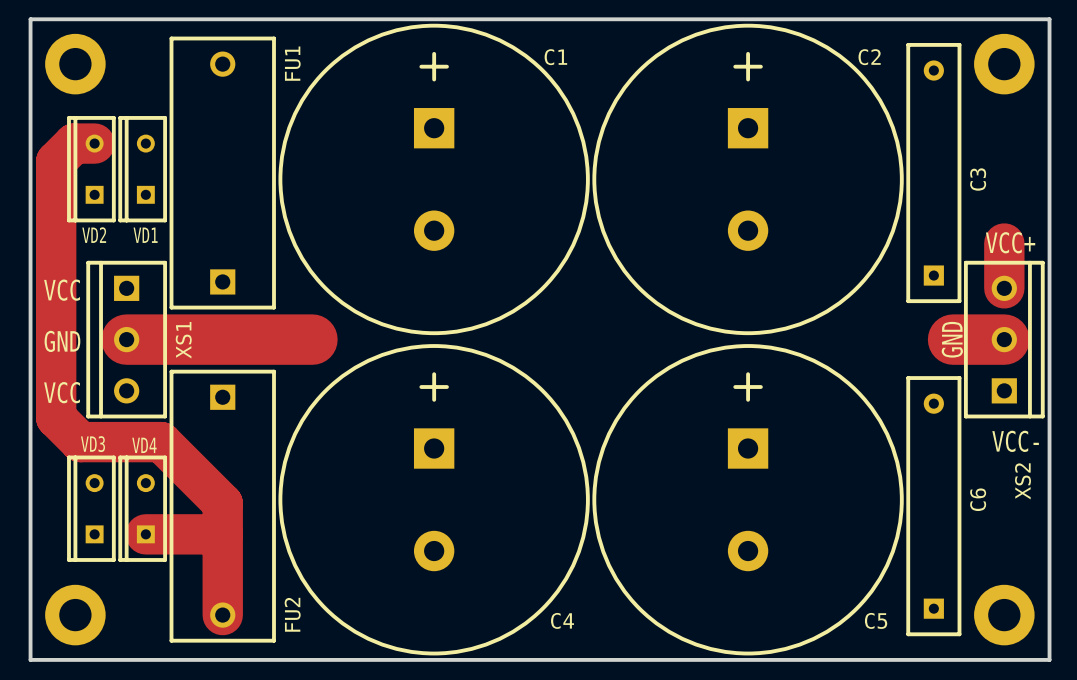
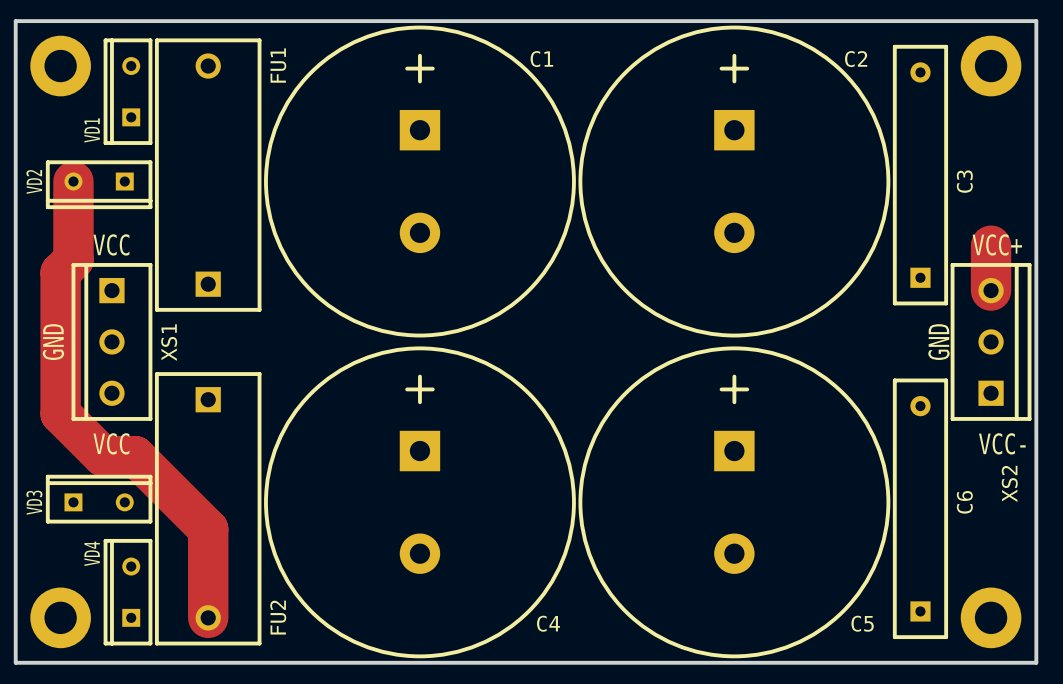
track: (94, 143) (74, 143) (56, 161) (56, 417) (80, 442) (161, 442) (222, 503) (222, 526) -> (73, 181) (73, 259) (60, 272) (60, 413) (102, 456) (135, 456) (208, 529)
VD2 rotation: 0° (91, 169) -> 90° counterclockwise (99, 184)
VD1 position: (142, 169) -> (128, 91)
VD2 name position: VD2 (94, 235) -> VD2 (34, 181)
VD1 name rotation: 0° (145, 235) -> 90° counterclockwise (92, 130)
VD1 name position: VD1 (145, 235) -> VD1 (92, 130)
text position: VCC (62, 290) -> VCC (111, 244)
track: (126, 339) (312, 339) -> none
track: (953, 339) (1004, 339) -> none
text rotation: 0° (62, 341) -> 90° counterclockwise (53, 342)
text position: VCC (62, 392) -> VCC (111, 443)
VD3 name position: VD3 (93, 444) -> VD3 (34, 502)
VD4 name rotation: 0° (144, 445) -> 90° counterclockwise (92, 553)
VD4 name position: VD4 (144, 445) -> VD4 (92, 553)
VD3 rotation: 0° (91, 508) -> 90° clockwise (99, 499)
VD4 position: (142, 508) -> (128, 592)
track: (145, 534) (222, 534) -> none

